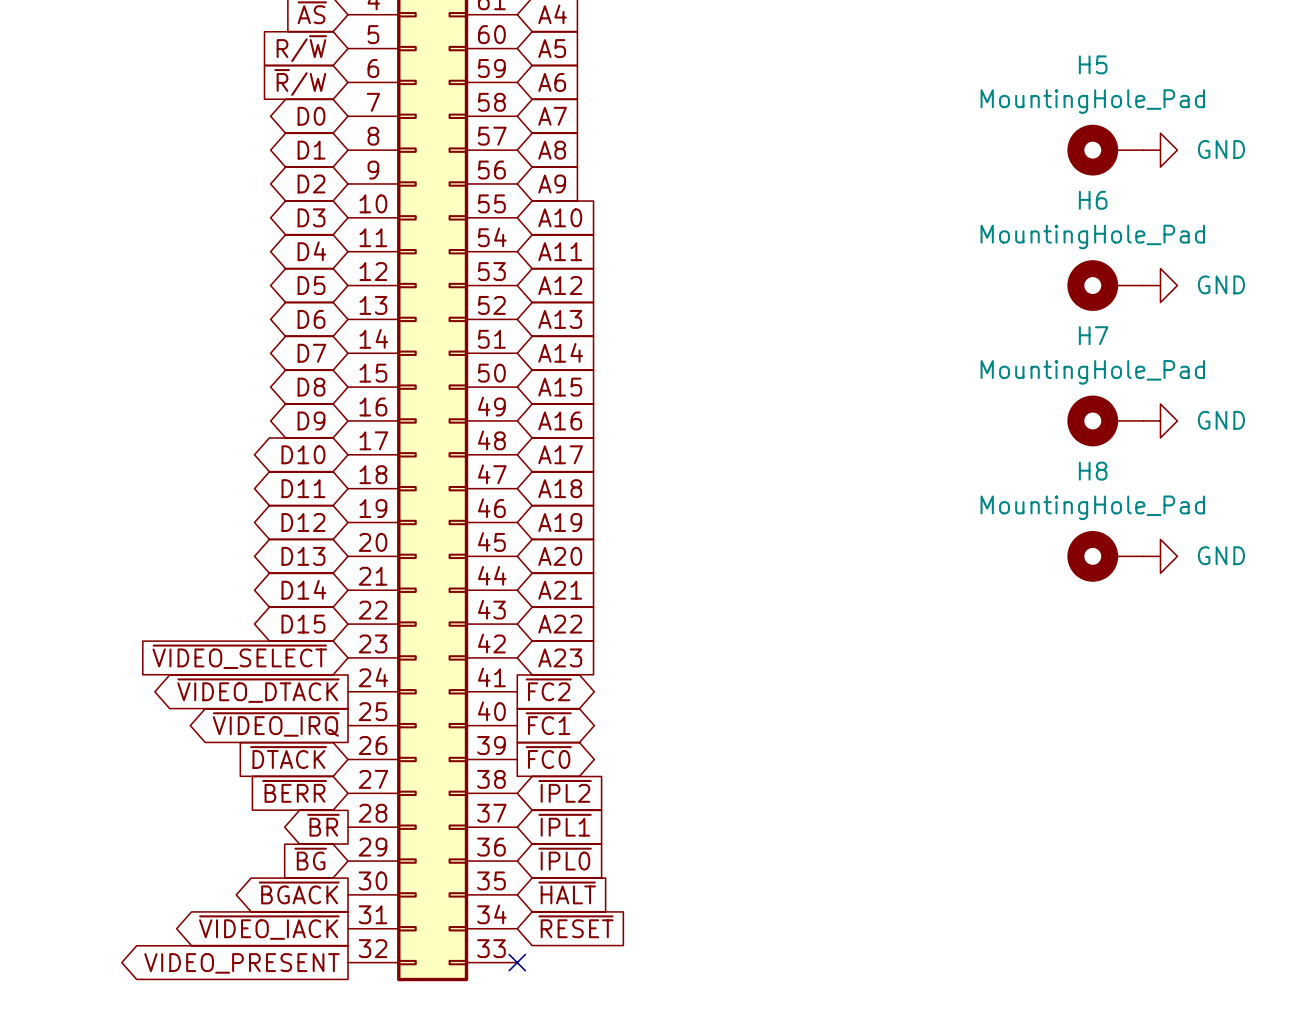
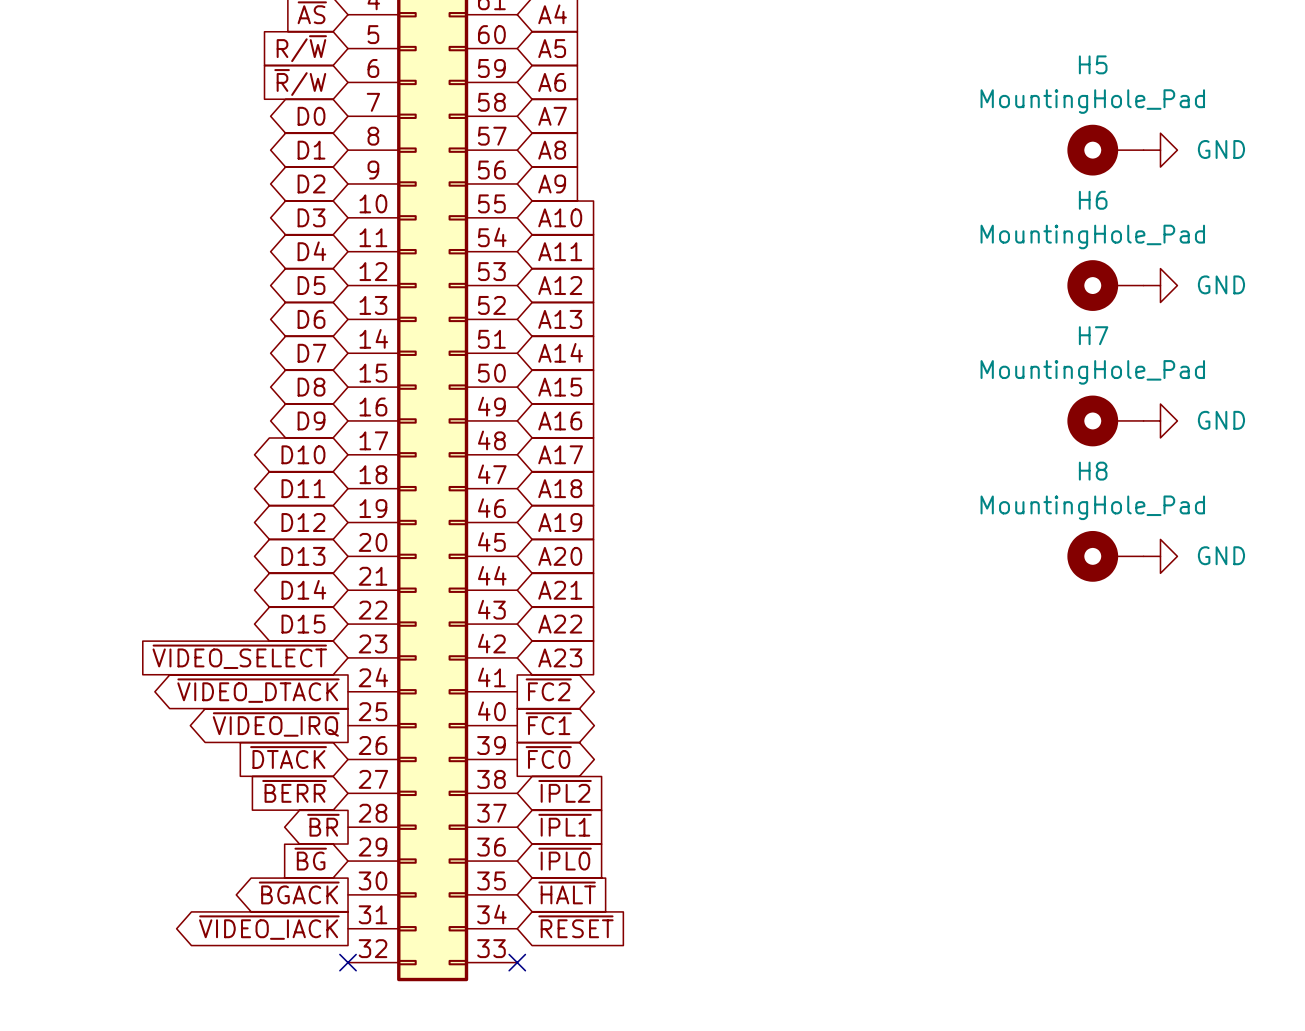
no-connect mark: none -> (348, 962)
global label: VIDEO_PRESENT (241, 963) -> none

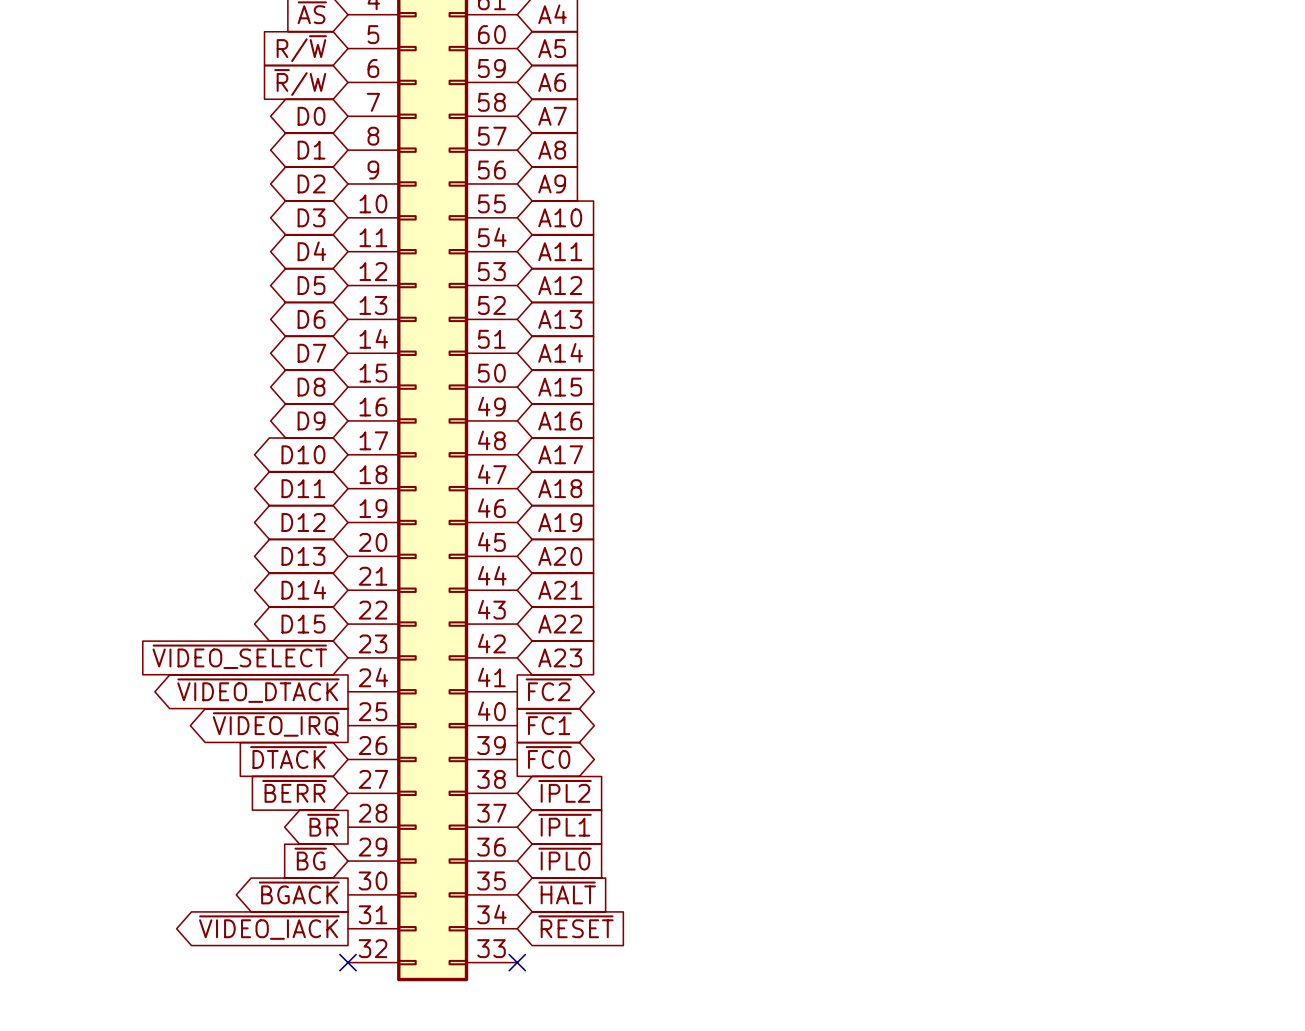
H5: MountingHole_Pad (1105, 150) -> none
power symbol: GND (1160, 150) -> none
H6: MountingHole_Pad (1105, 285) -> none
power symbol: GND (1160, 285) -> none
H7: MountingHole_Pad (1105, 420) -> none
power symbol: GND (1160, 420) -> none
H8: MountingHole_Pad (1105, 556) -> none
power symbol: GND (1160, 556) -> none

